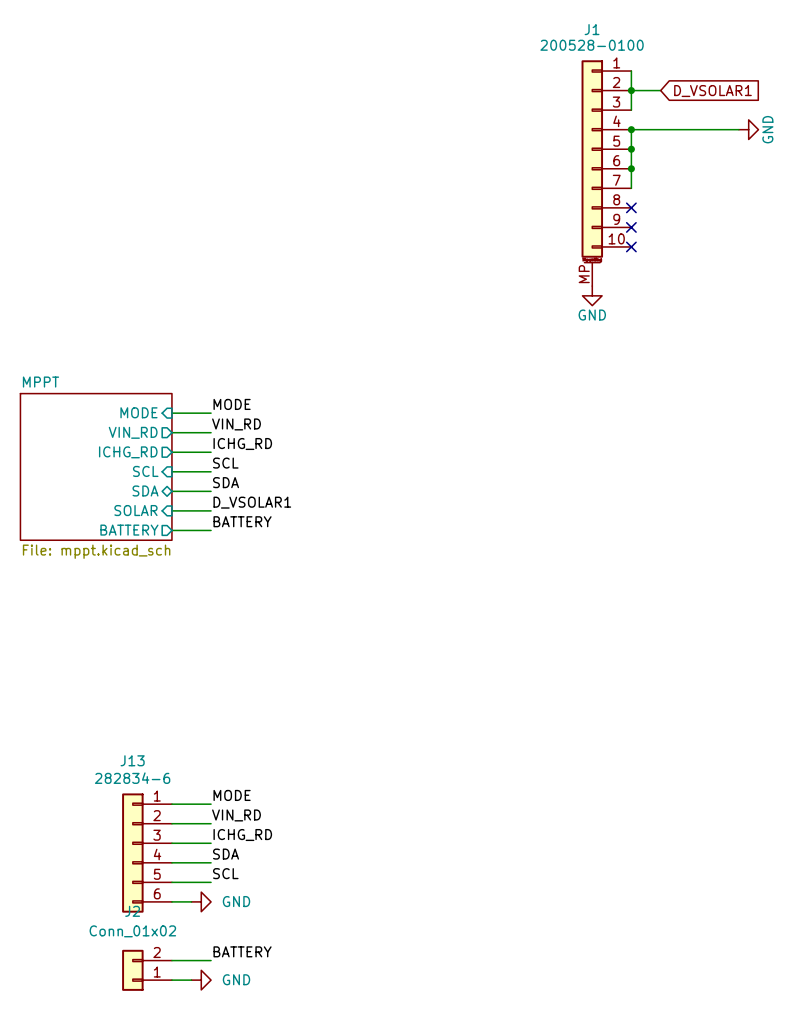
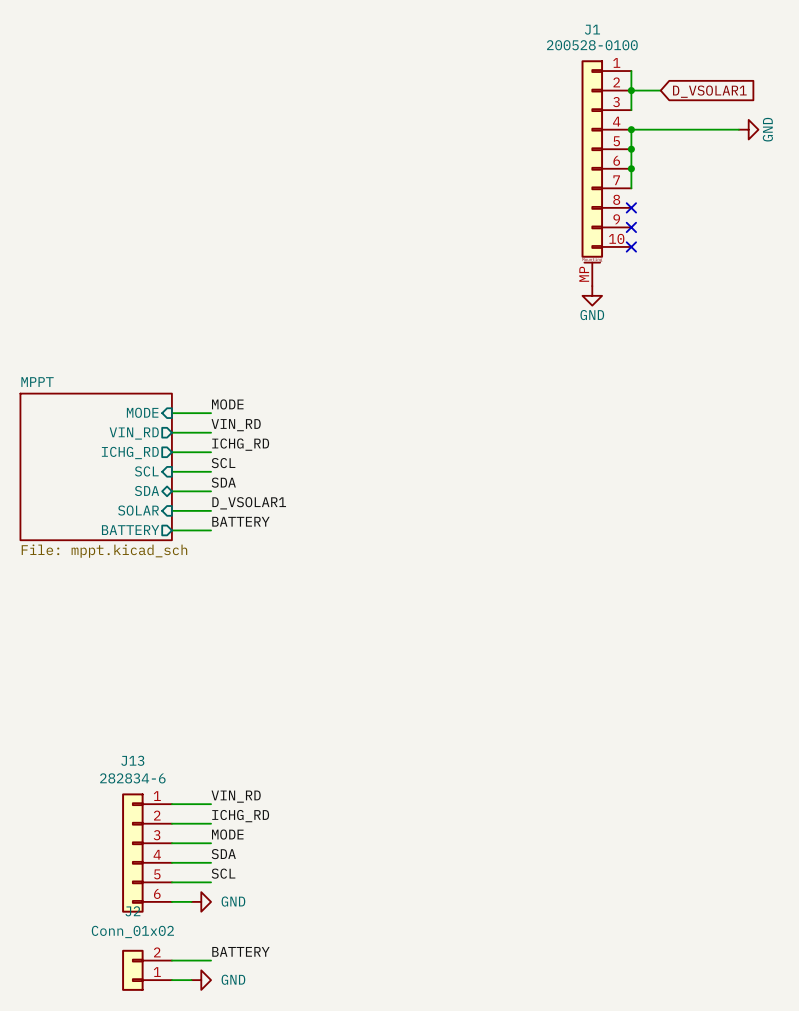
label: MODE (232, 795) -> VIN_RD (236, 796)
label: VIN_RD (236, 815) -> ICHG_RD (240, 816)
label: ICHG_RD (242, 835) -> MODE (227, 834)

